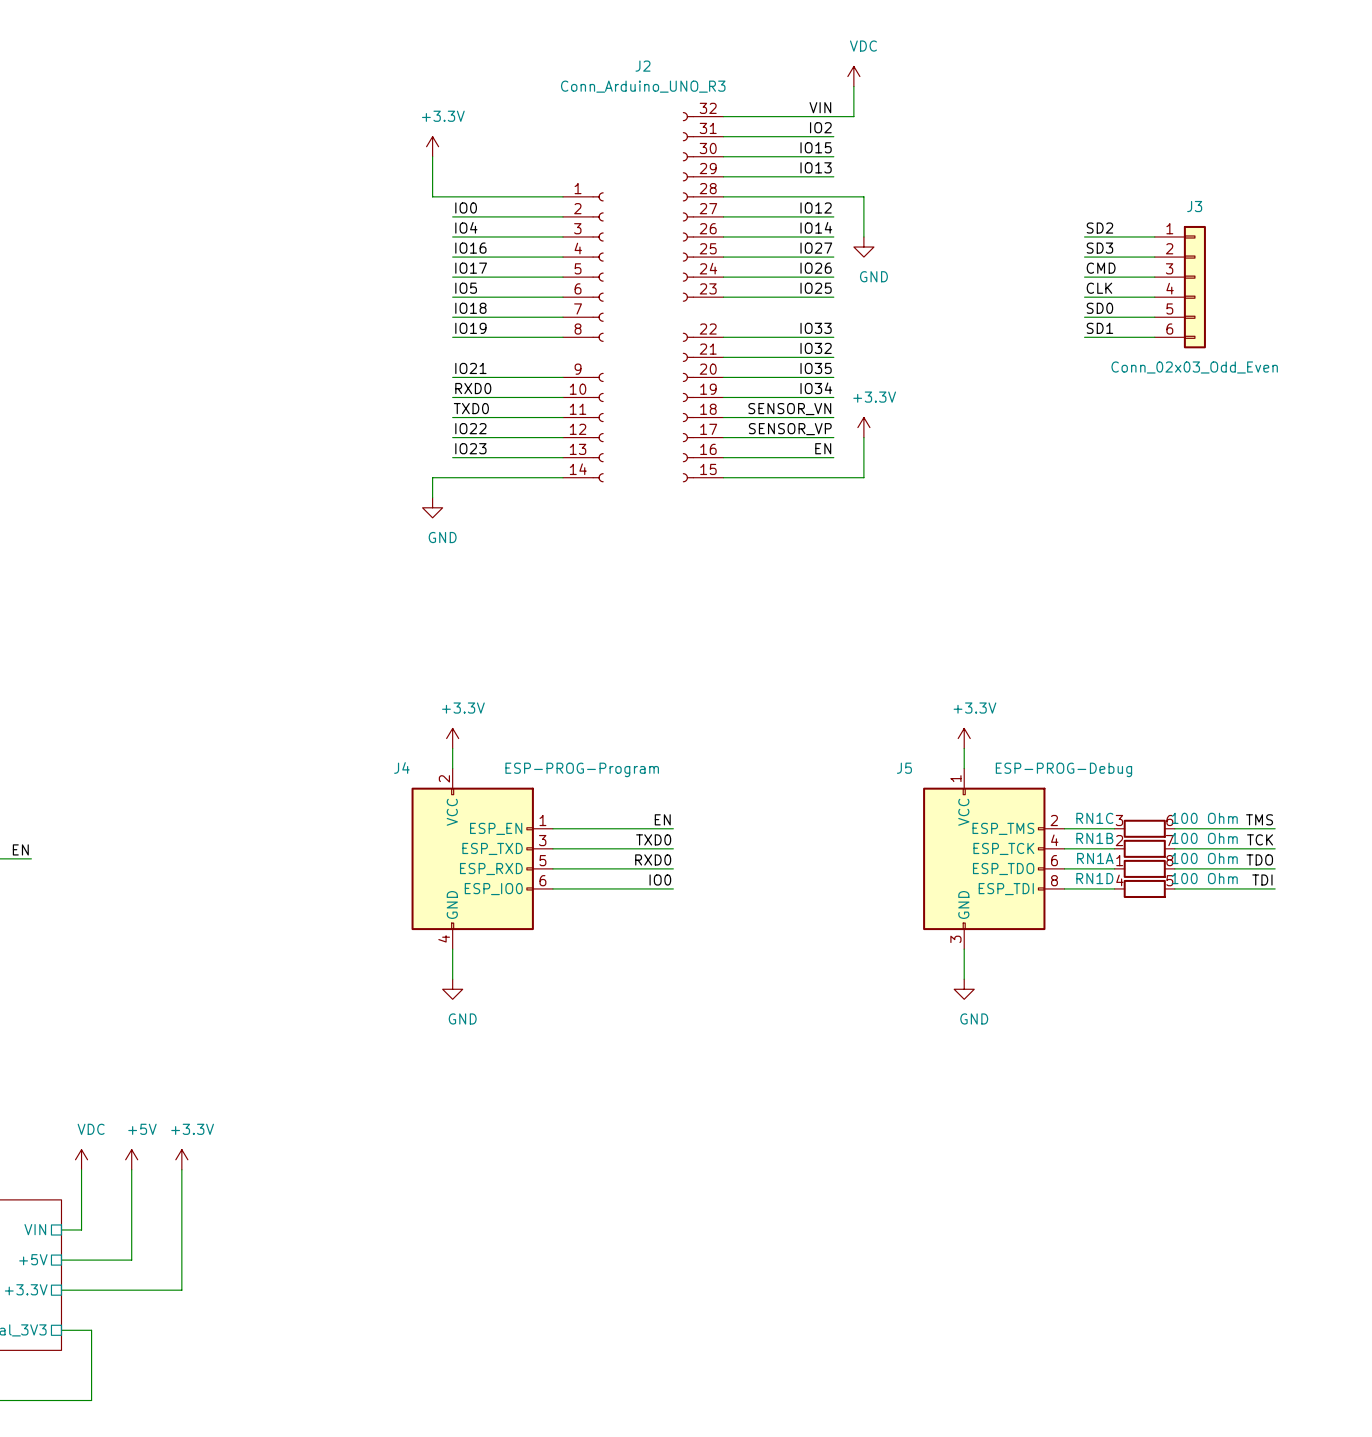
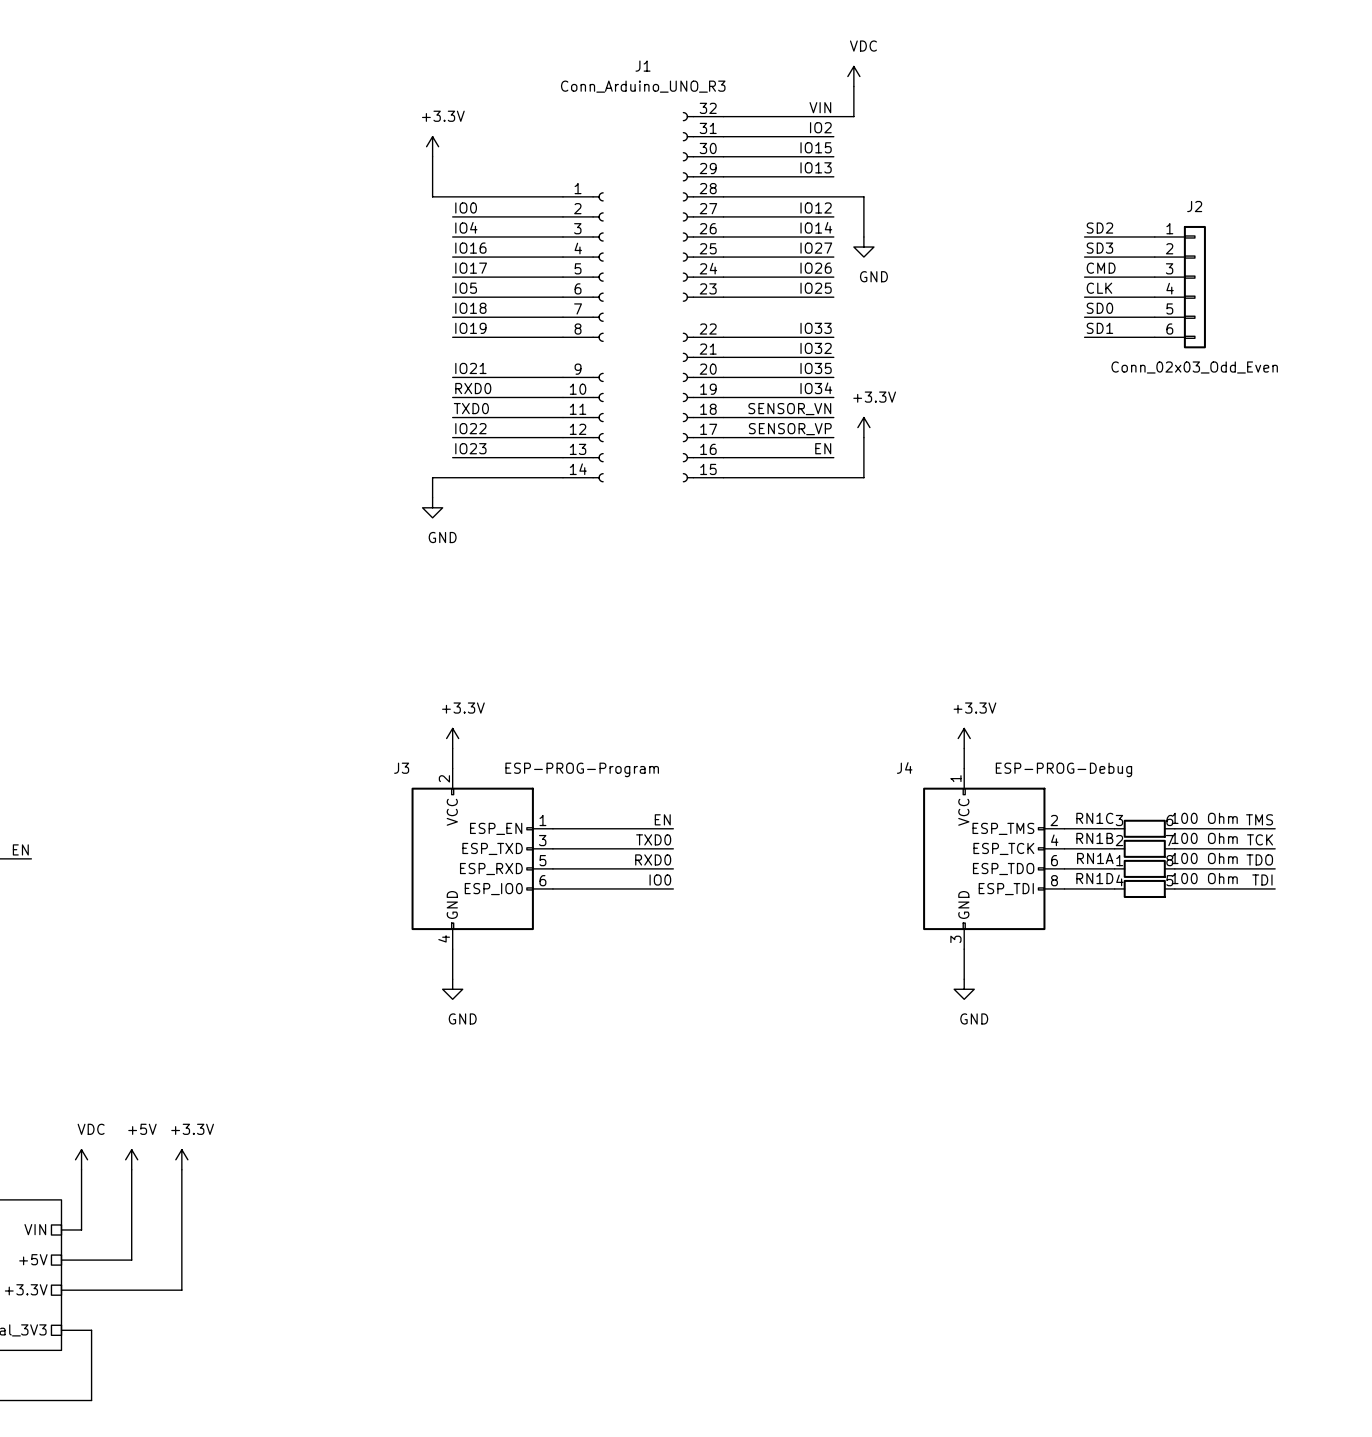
J2 name: J2 (643, 66) -> J1 (643, 66)
J3 name: J3 (1194, 206) -> J2 (1194, 206)
J4 name: J4 (401, 767) -> J3 (401, 768)
J5 name: J5 (904, 768) -> J4 (904, 767)

